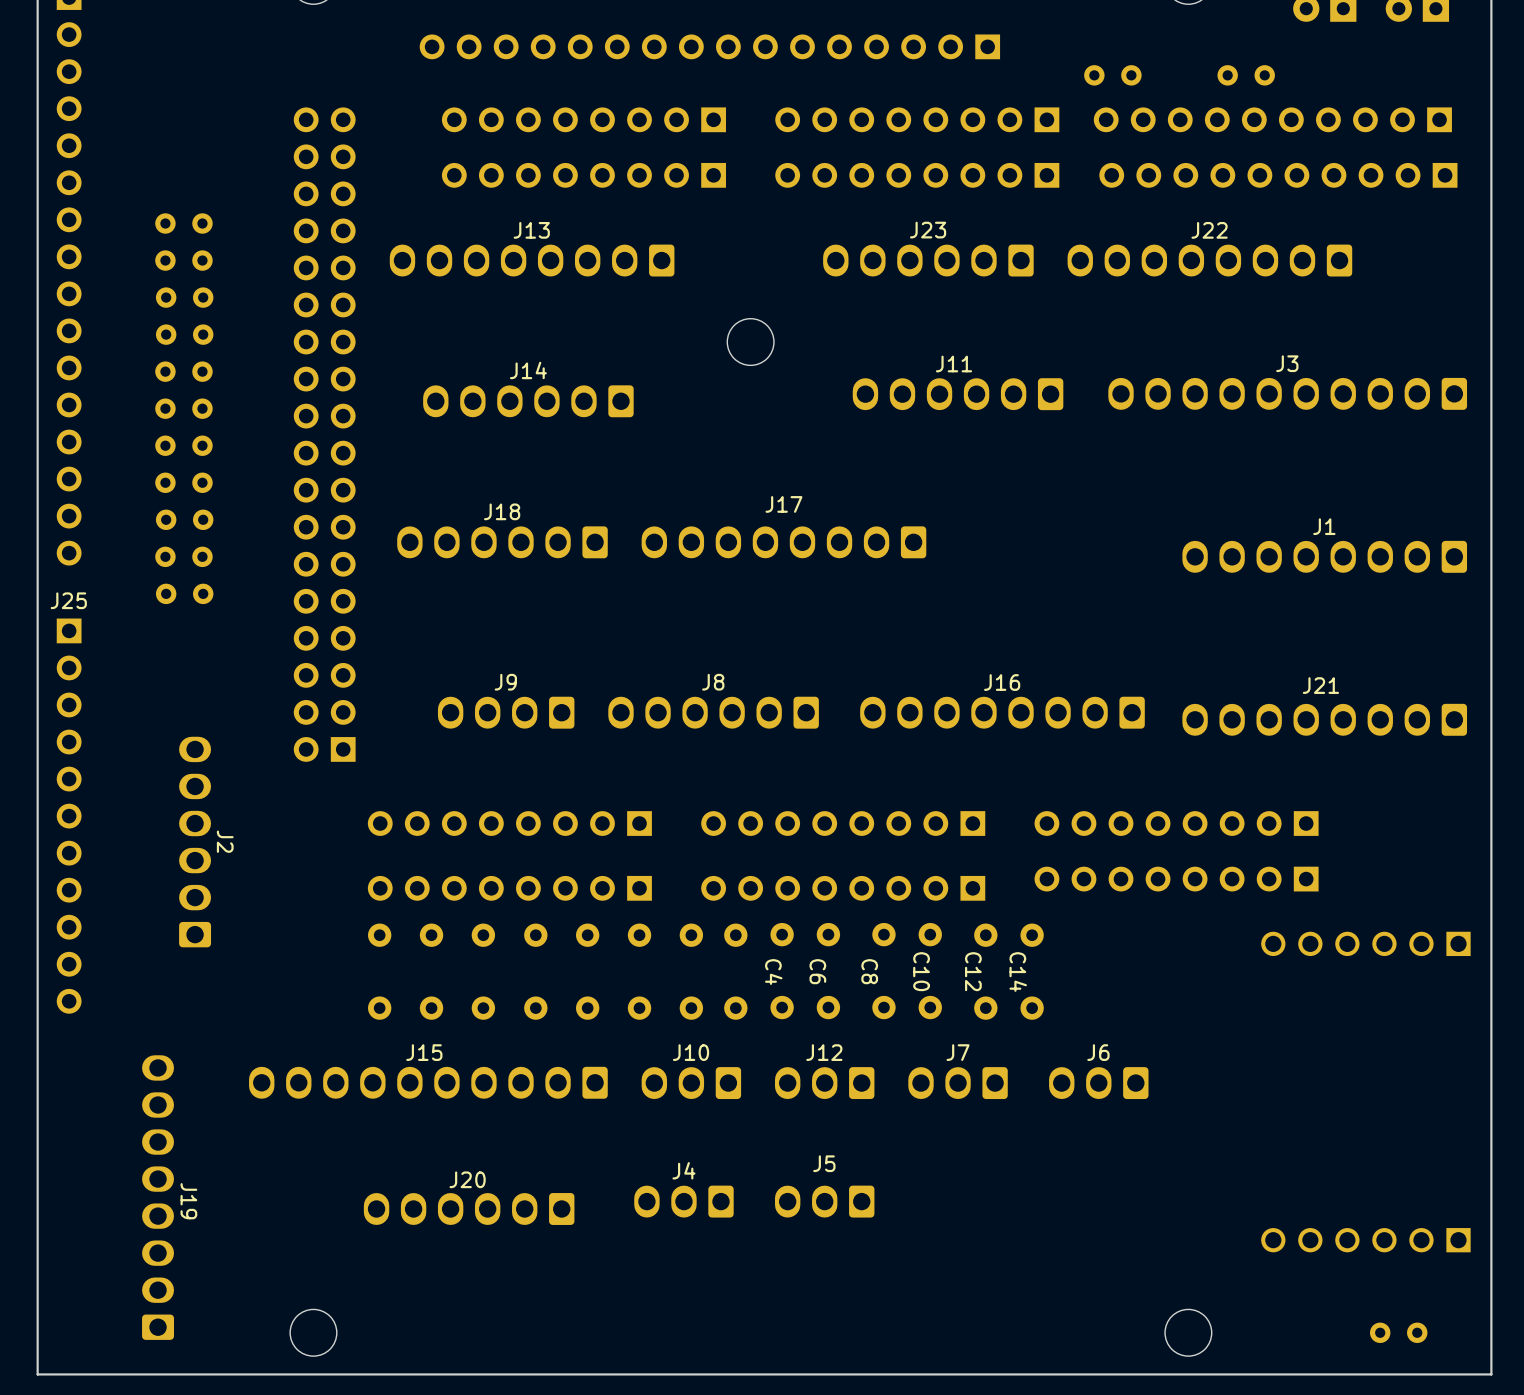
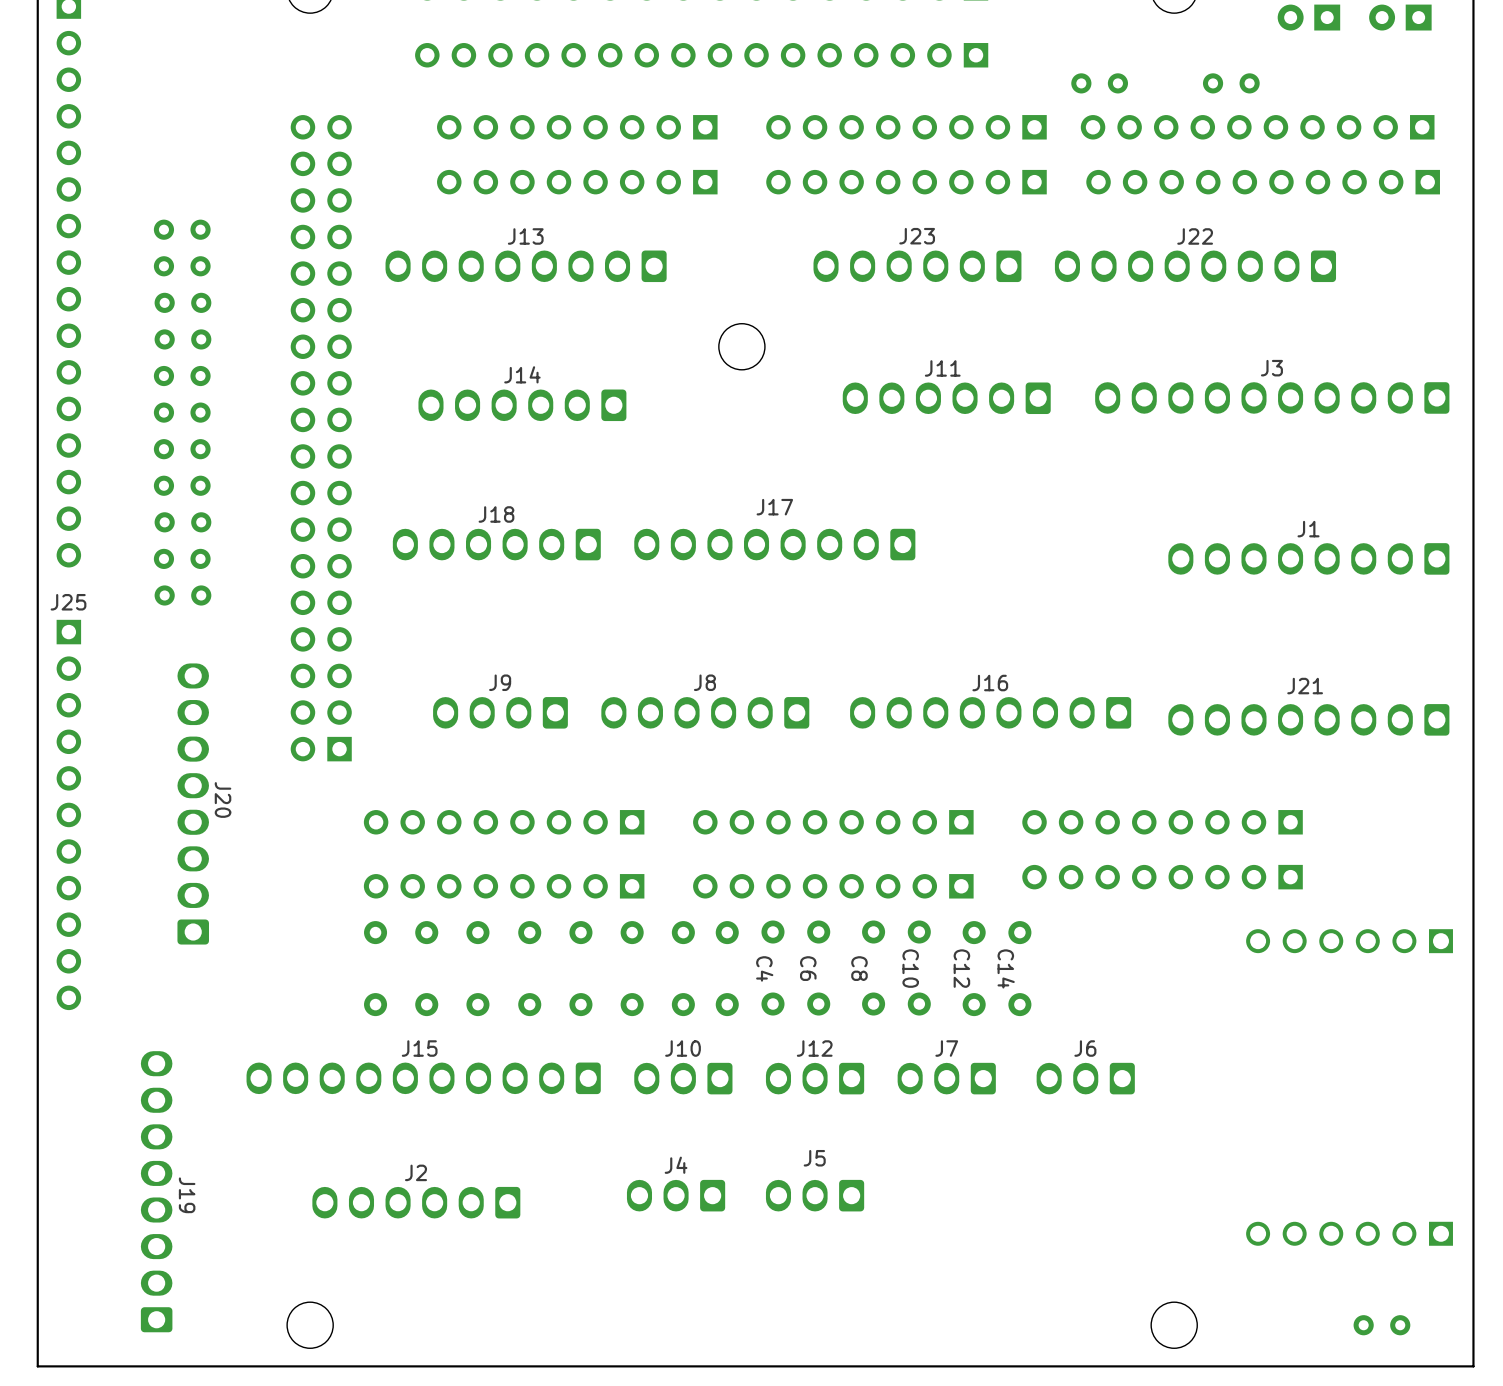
J2 rotation: 0° (195, 842) -> 90° counterclockwise (416, 1202)
J2 position: (195, 842) -> (416, 1202)
J20 name position: J20 (467, 1179) -> J20 (223, 799)
J20 footprint: [363, 1193, 575, 1225] -> [177, 663, 209, 945]

